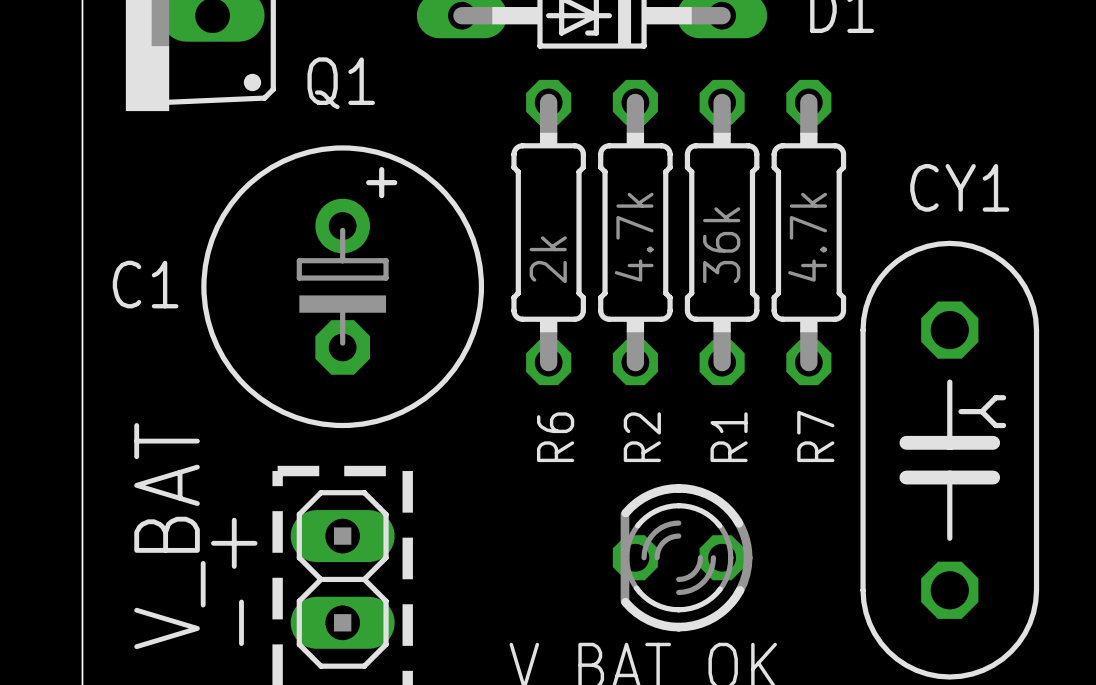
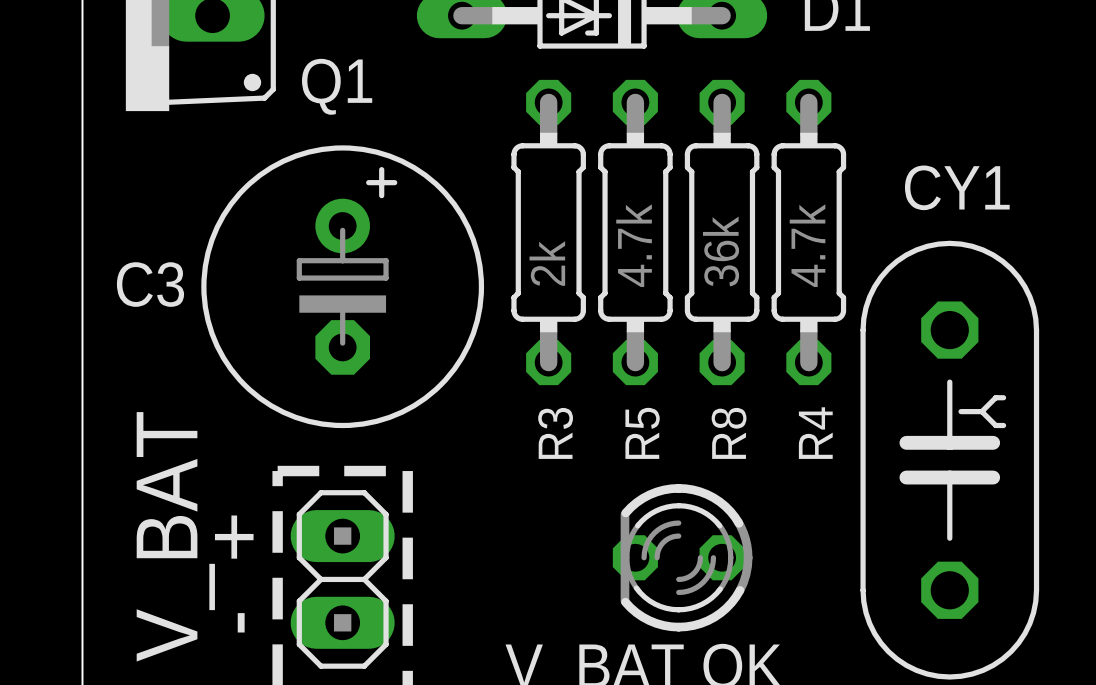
C1 name: C1 (145, 284) -> C3 (150, 284)
R7 name: R7 (815, 436) -> R4 (815, 433)
R6 name: R6 (555, 437) -> R3 (555, 433)
R2 name: R2 (642, 437) -> R5 (642, 433)
R1 name: R1 (729, 437) -> R8 (729, 433)

